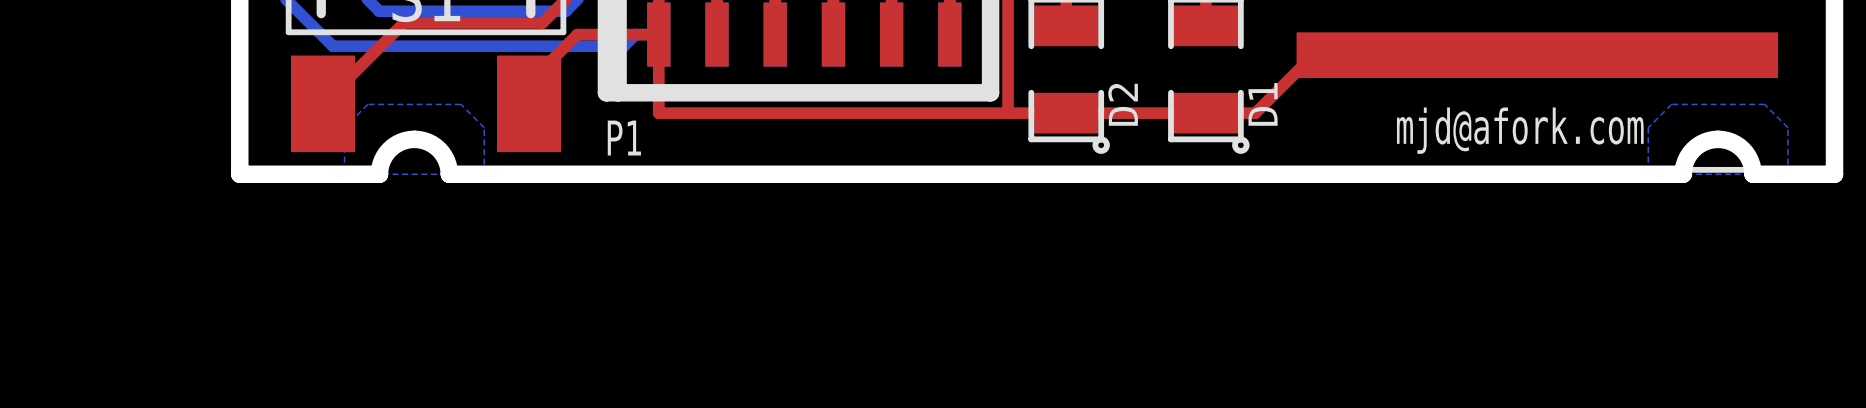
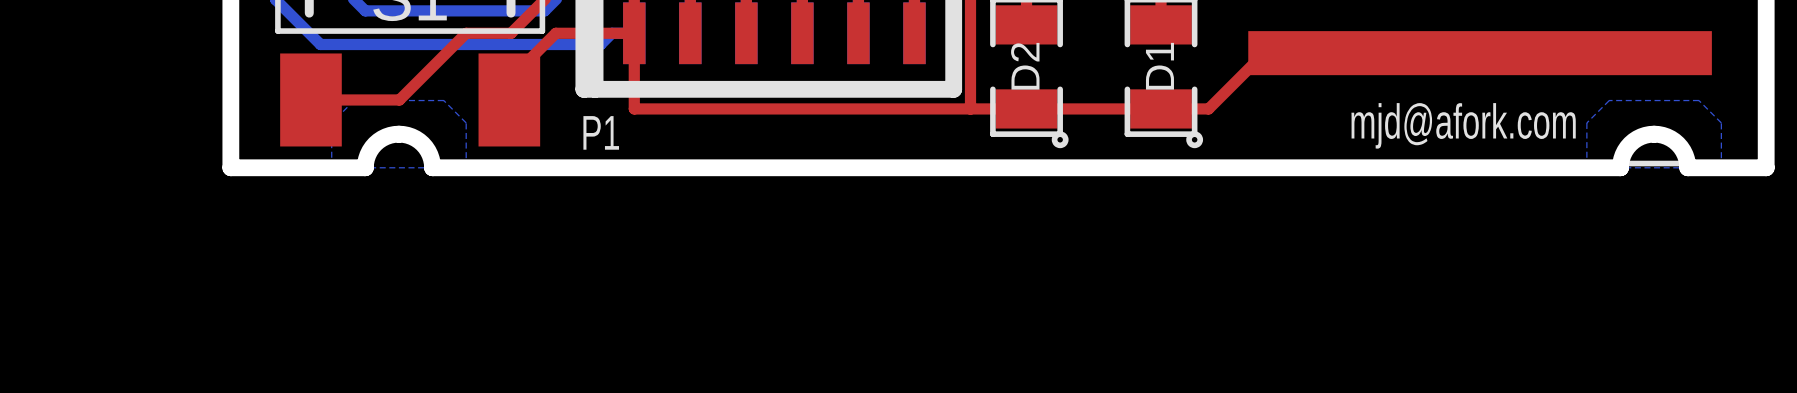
top track: (542, 22) (403, 22) (323, 103) -> (522, 22) (511, 33) (466, 33) (399, 99) (310, 99)
D2 name position: D2 (1123, 104) -> D2 (1025, 66)
D1 name position: D1 (1263, 104) -> D1 (1159, 66)

